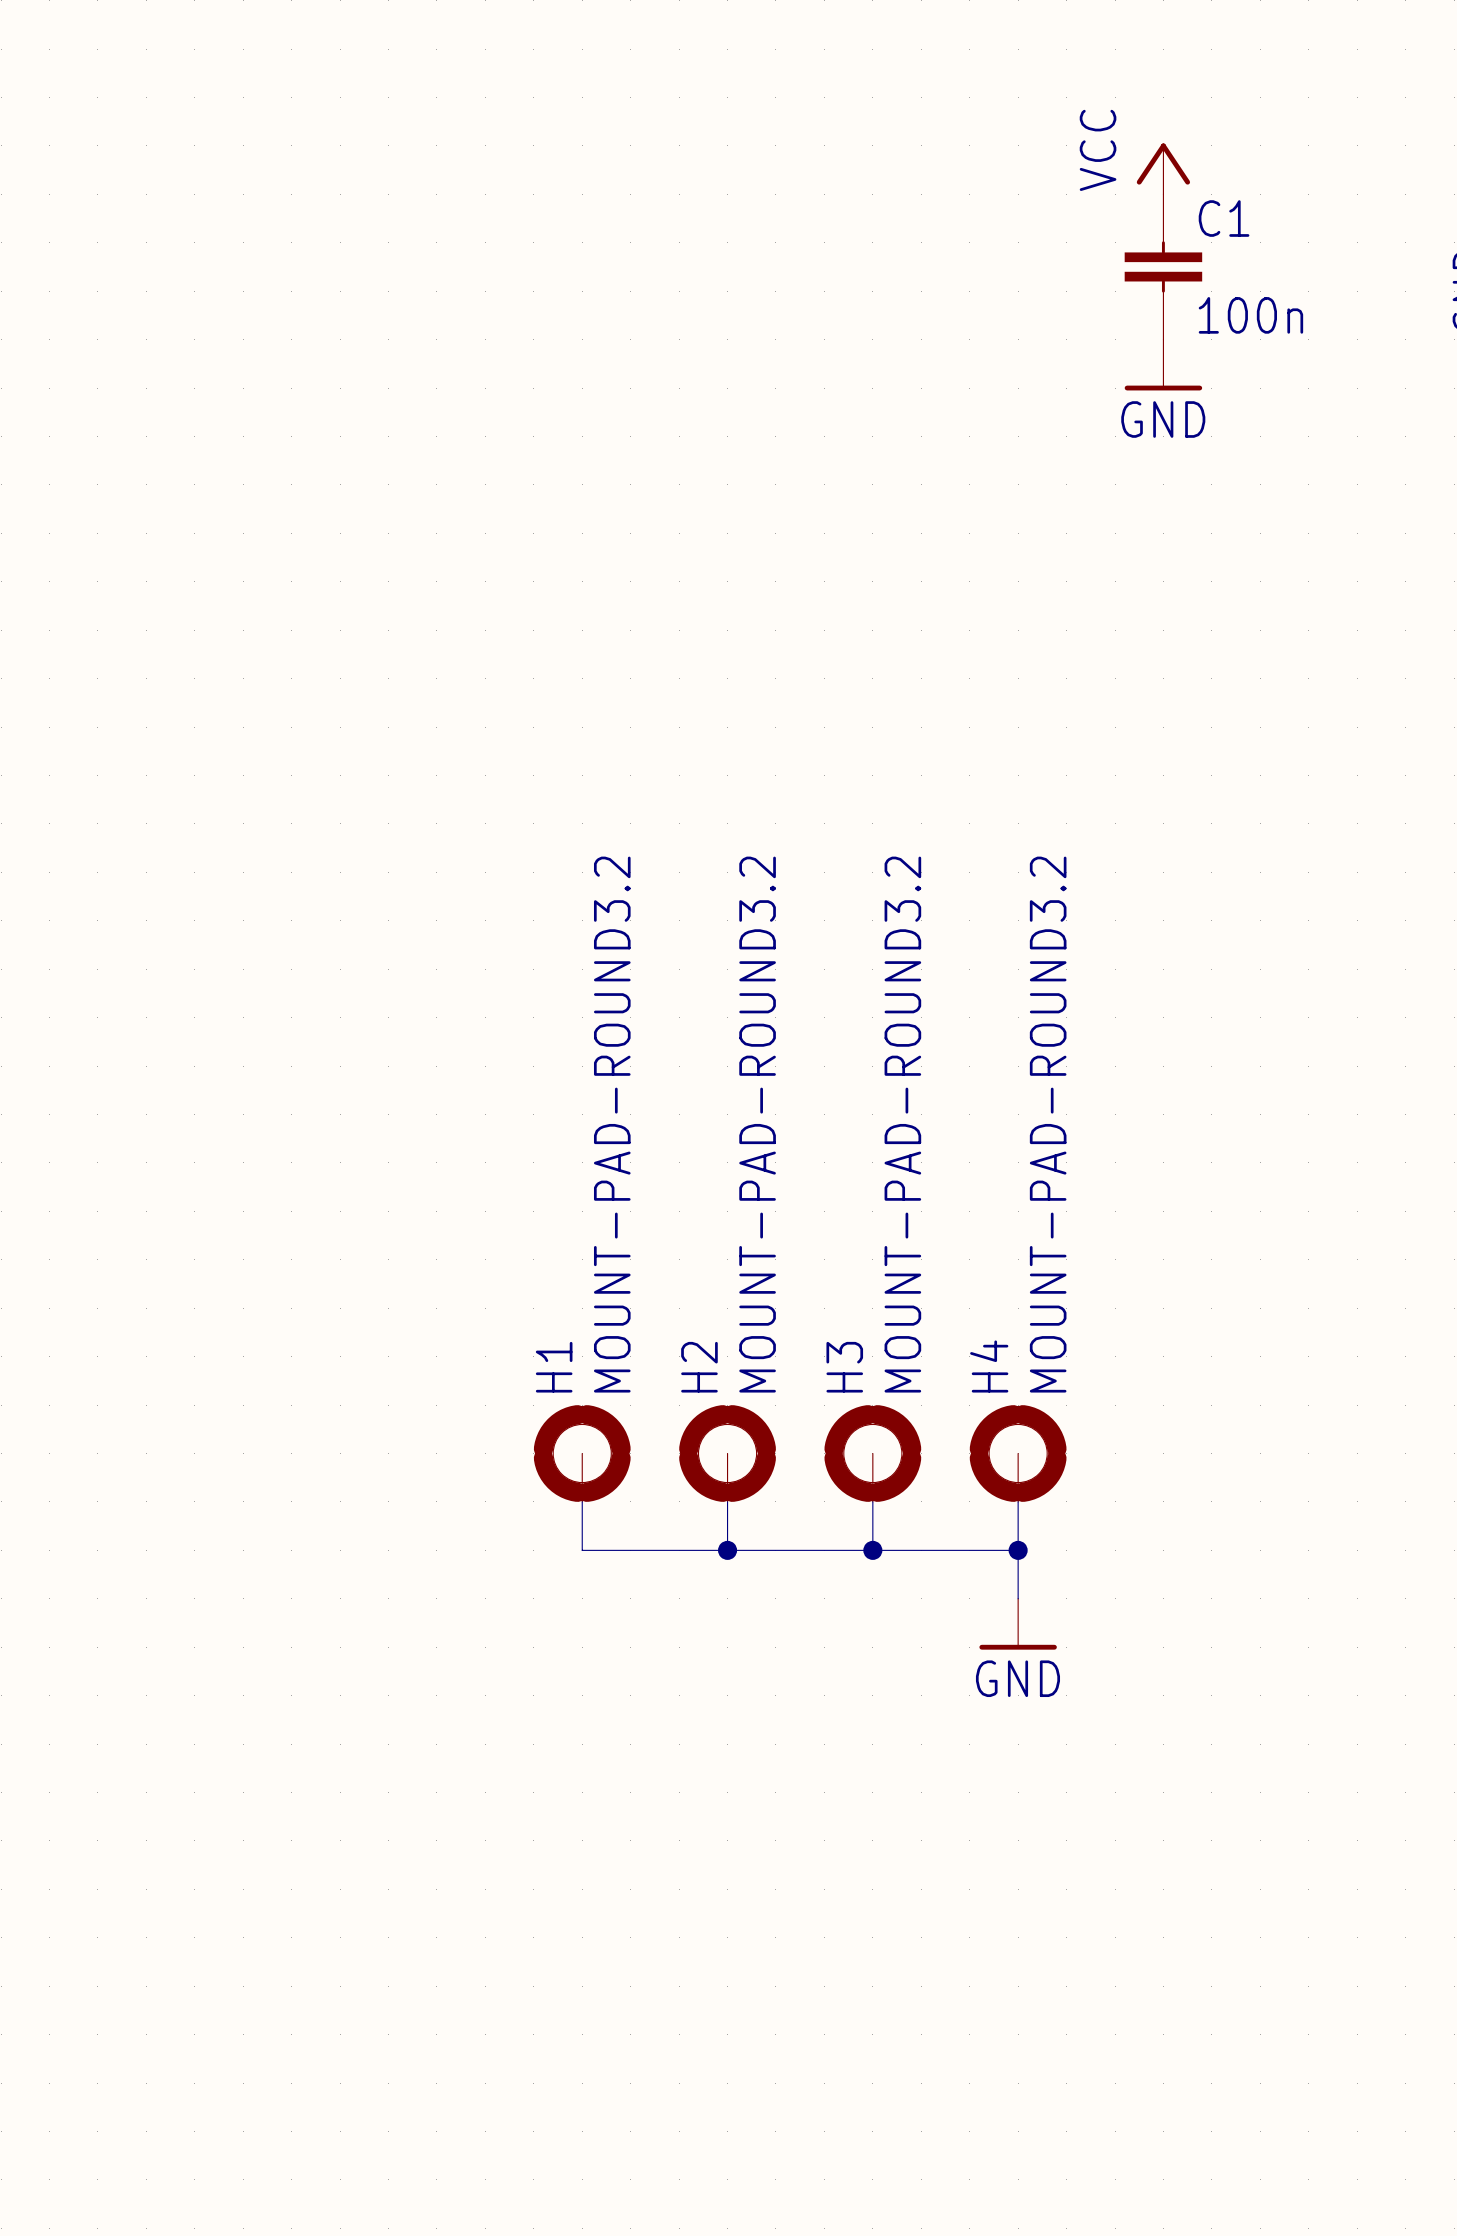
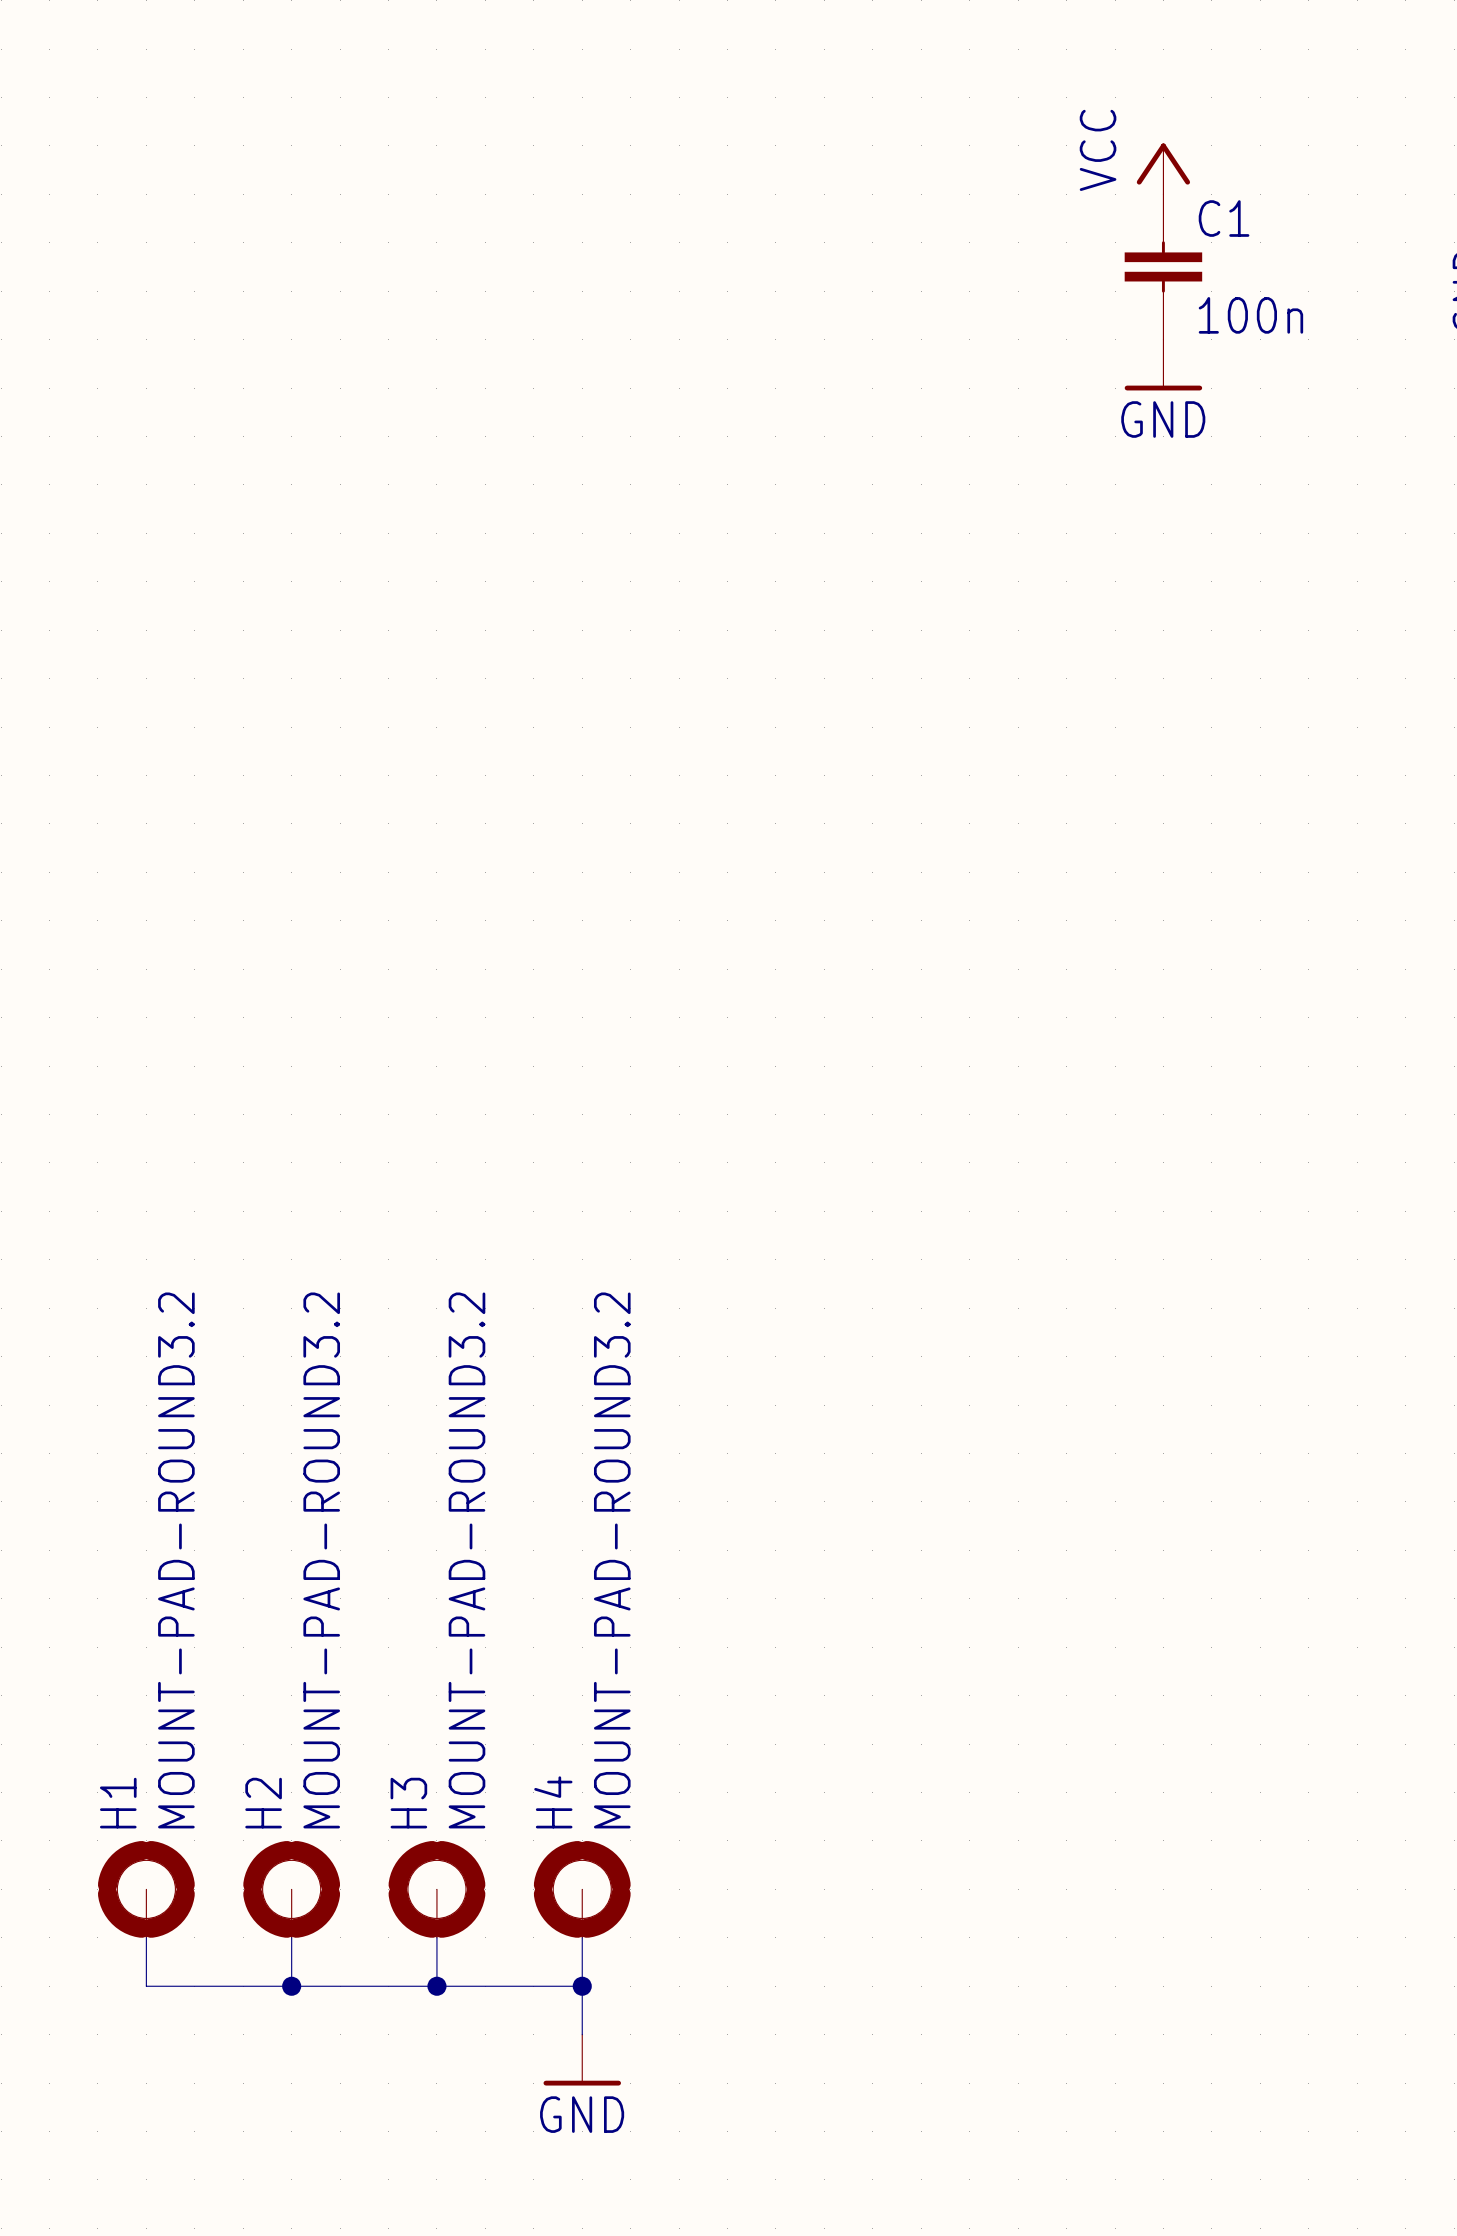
H1 position: (582, 1453) -> (146, 1889)
H2 position: (727, 1453) -> (291, 1889)
H3 position: (872, 1453) -> (436, 1889)
H4 position: (1018, 1453) -> (582, 1889)
wire: (582, 1501) (582, 1550) (1018, 1550) -> none
wire: (727, 1501) (727, 1550) -> none
wire: (872, 1501) (872, 1550) -> none
wire: (1018, 1501) (1018, 1598) -> none
junction: (727, 1550) -> none
junction: (872, 1550) -> none
junction: (1018, 1550) -> none
power symbol: GND (1018, 1624) -> none
wire: none -> (146, 1937) (146, 1986) (582, 1986)
wire: none -> (291, 1937) (291, 1986)
wire: none -> (436, 1937) (436, 1986)
wire: none -> (582, 1937) (582, 2034)
junction: none -> (291, 1986)
junction: none -> (436, 1986)
junction: none -> (582, 1986)
power symbol: none -> GND (582, 2060)

